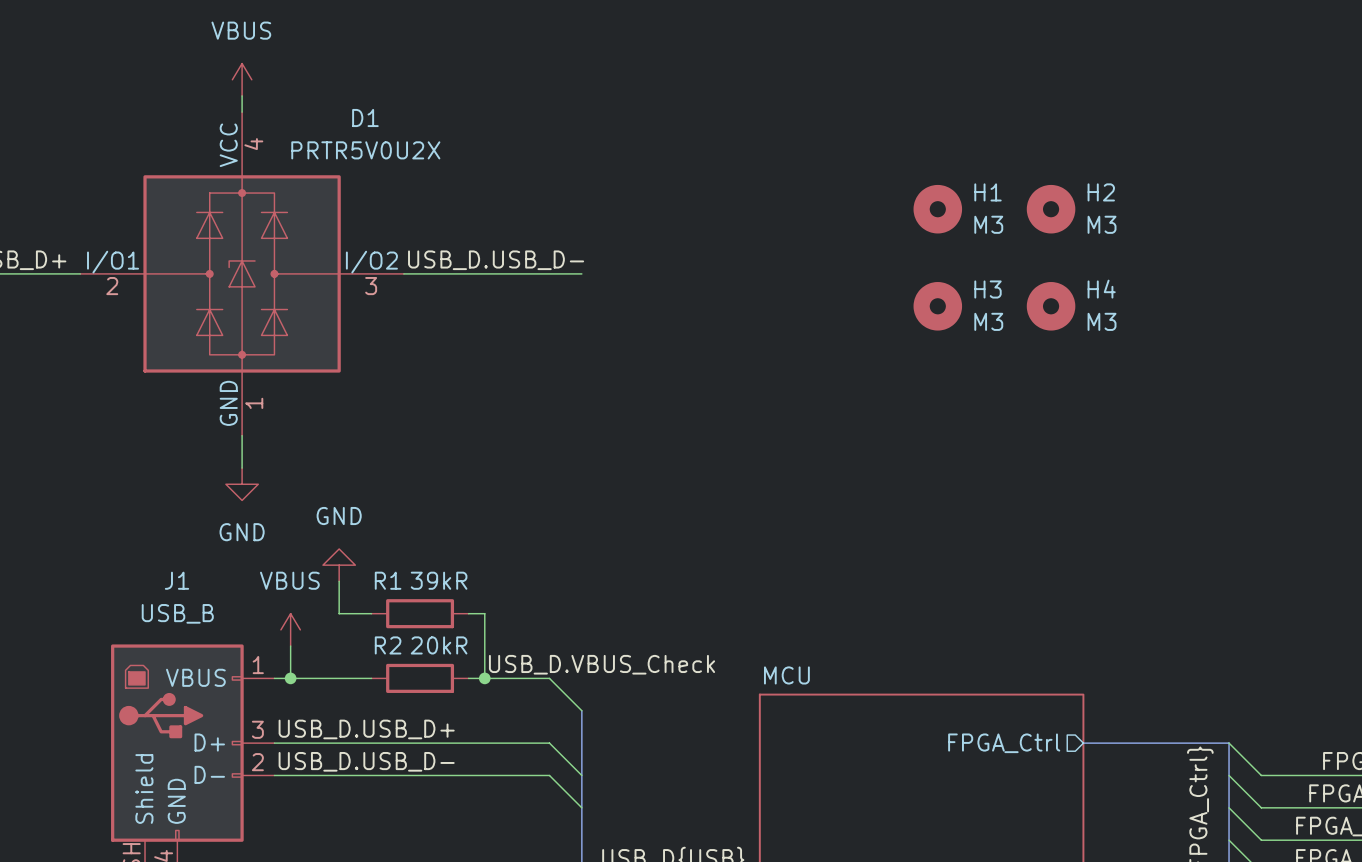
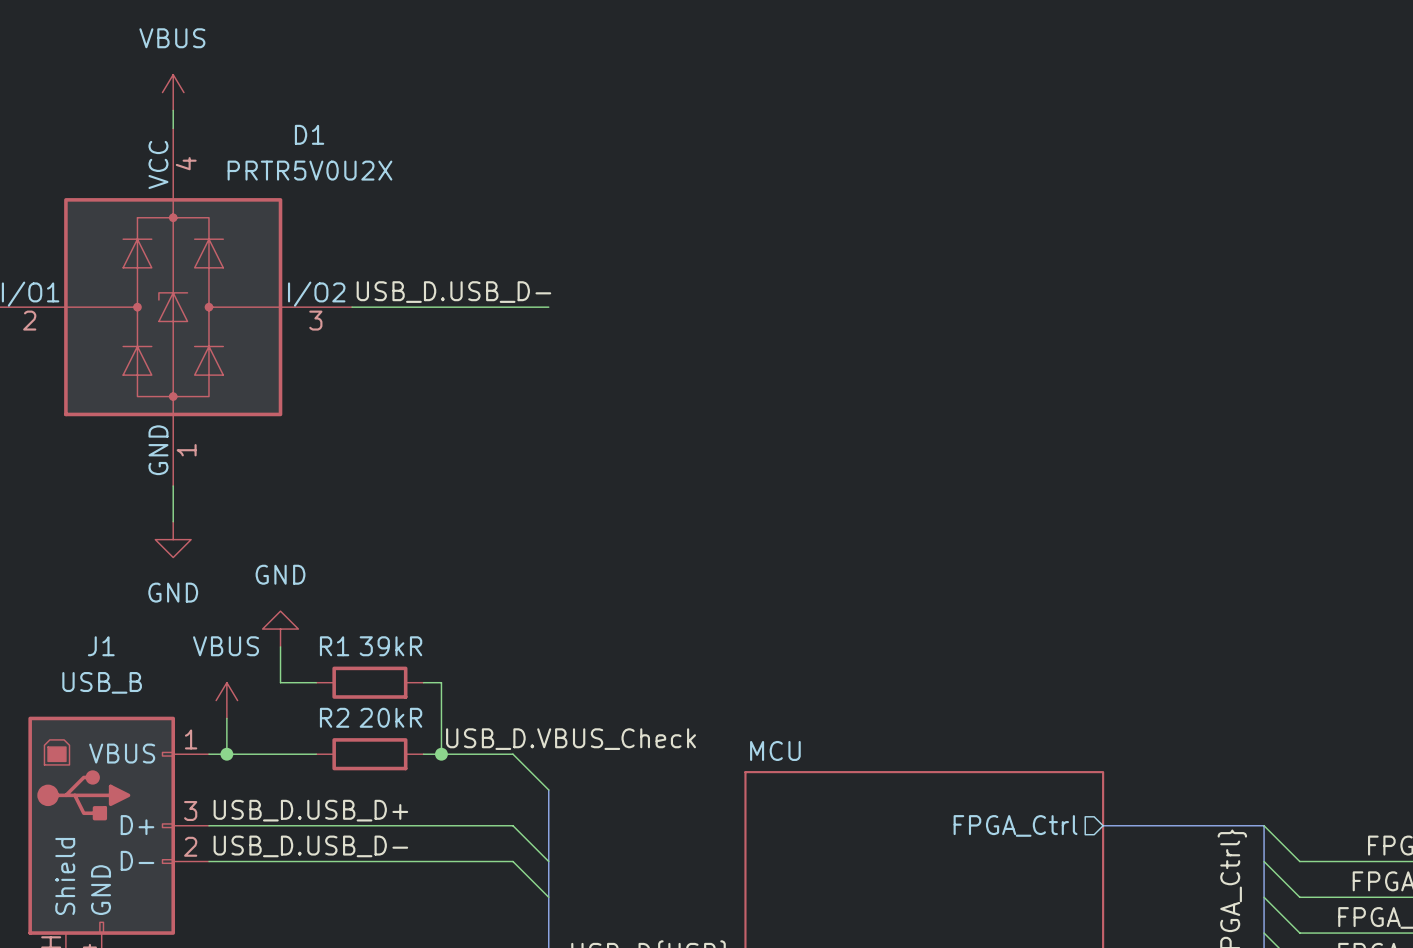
H1: M3 (937, 209) -> none
H2: M3 (1051, 209) -> none
H3: M3 (937, 306) -> none
H4: M3 (1051, 306) -> none

